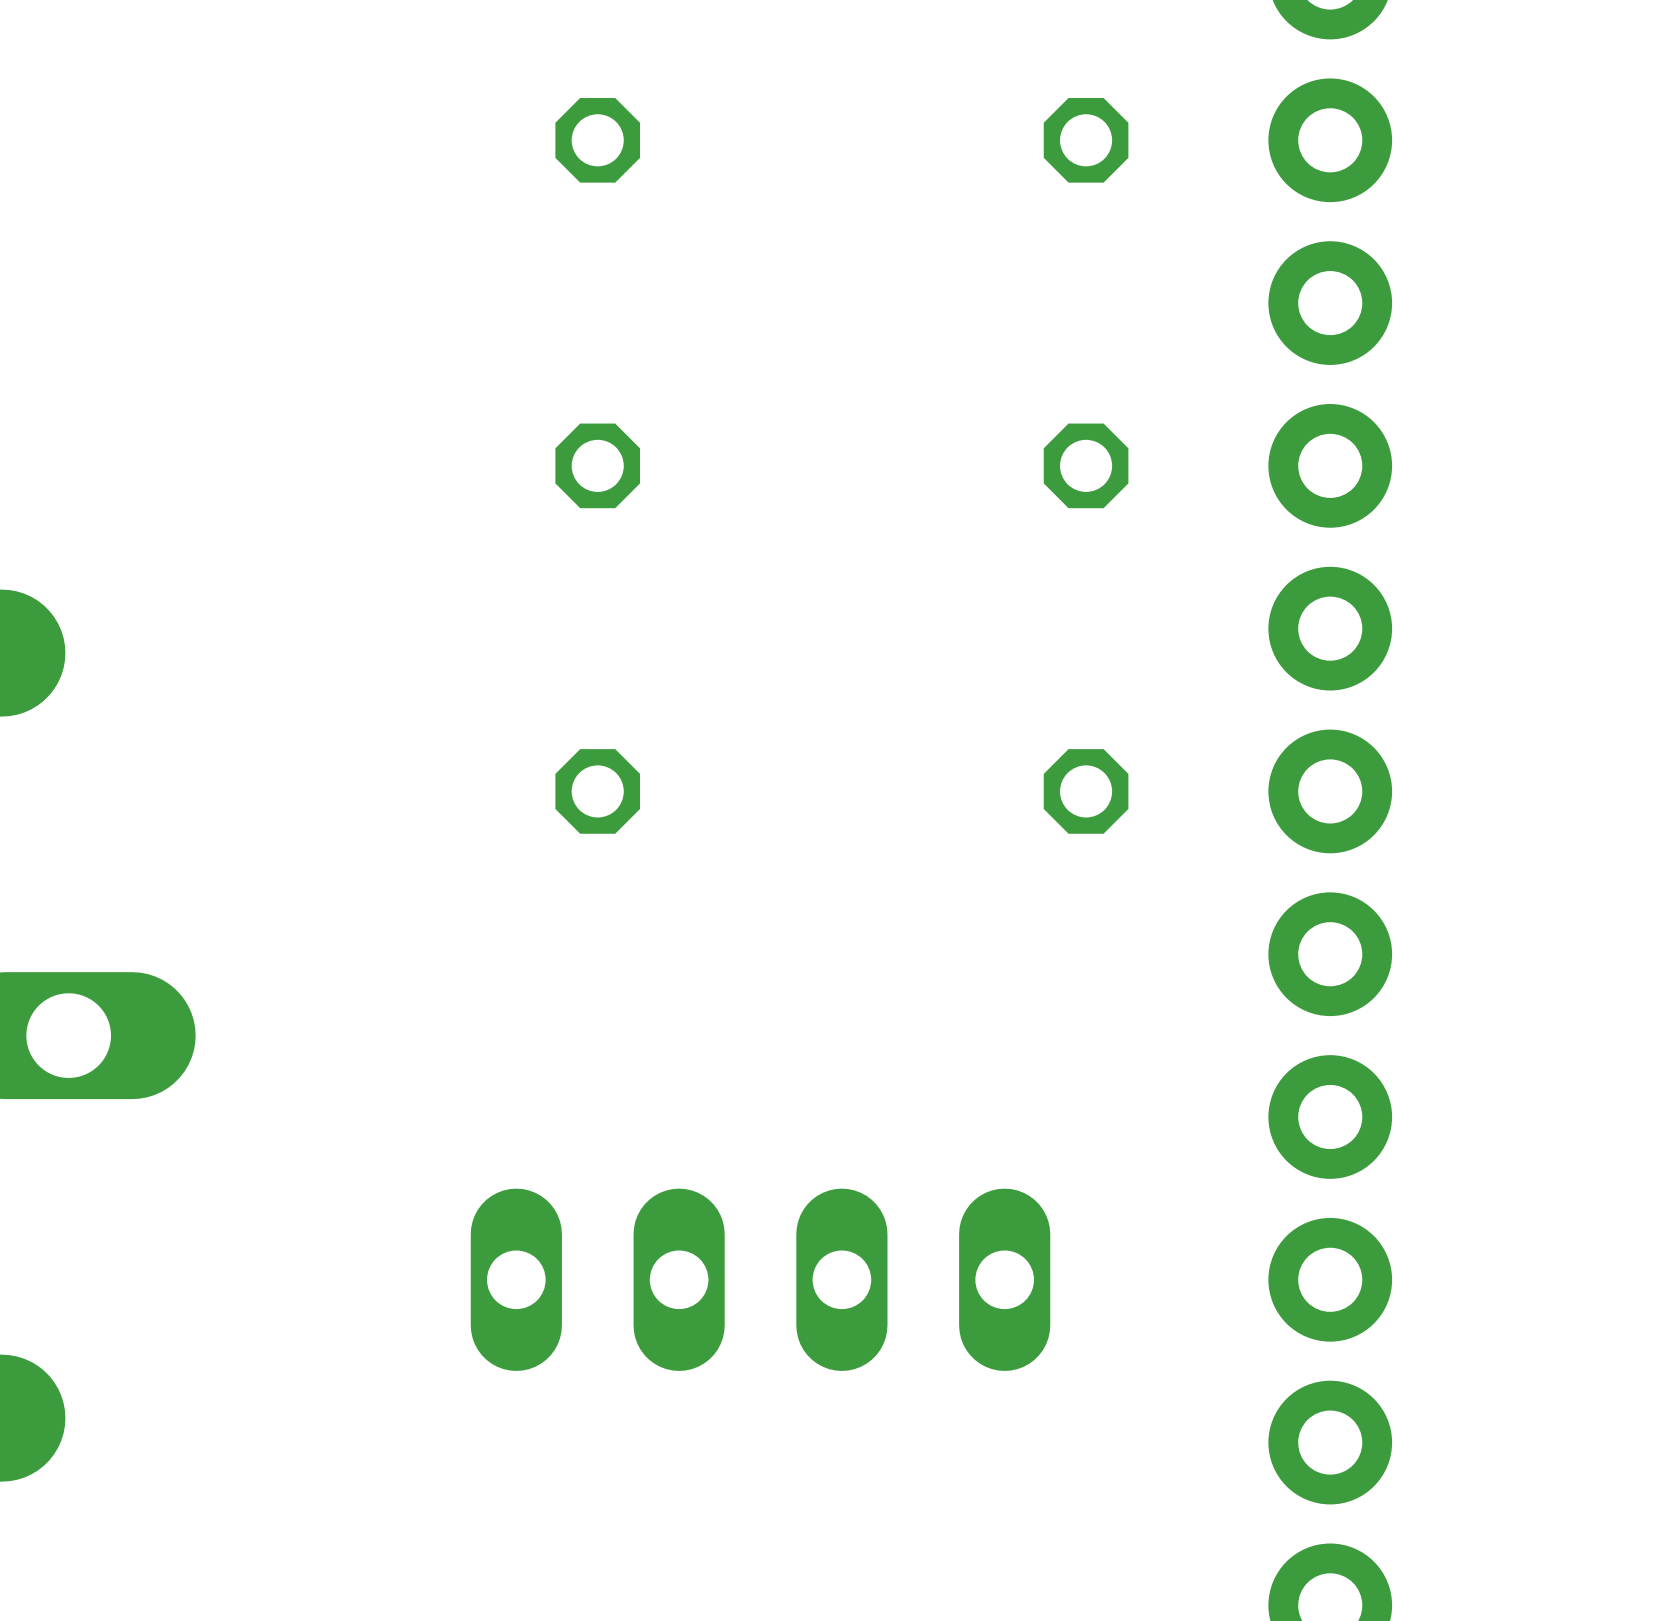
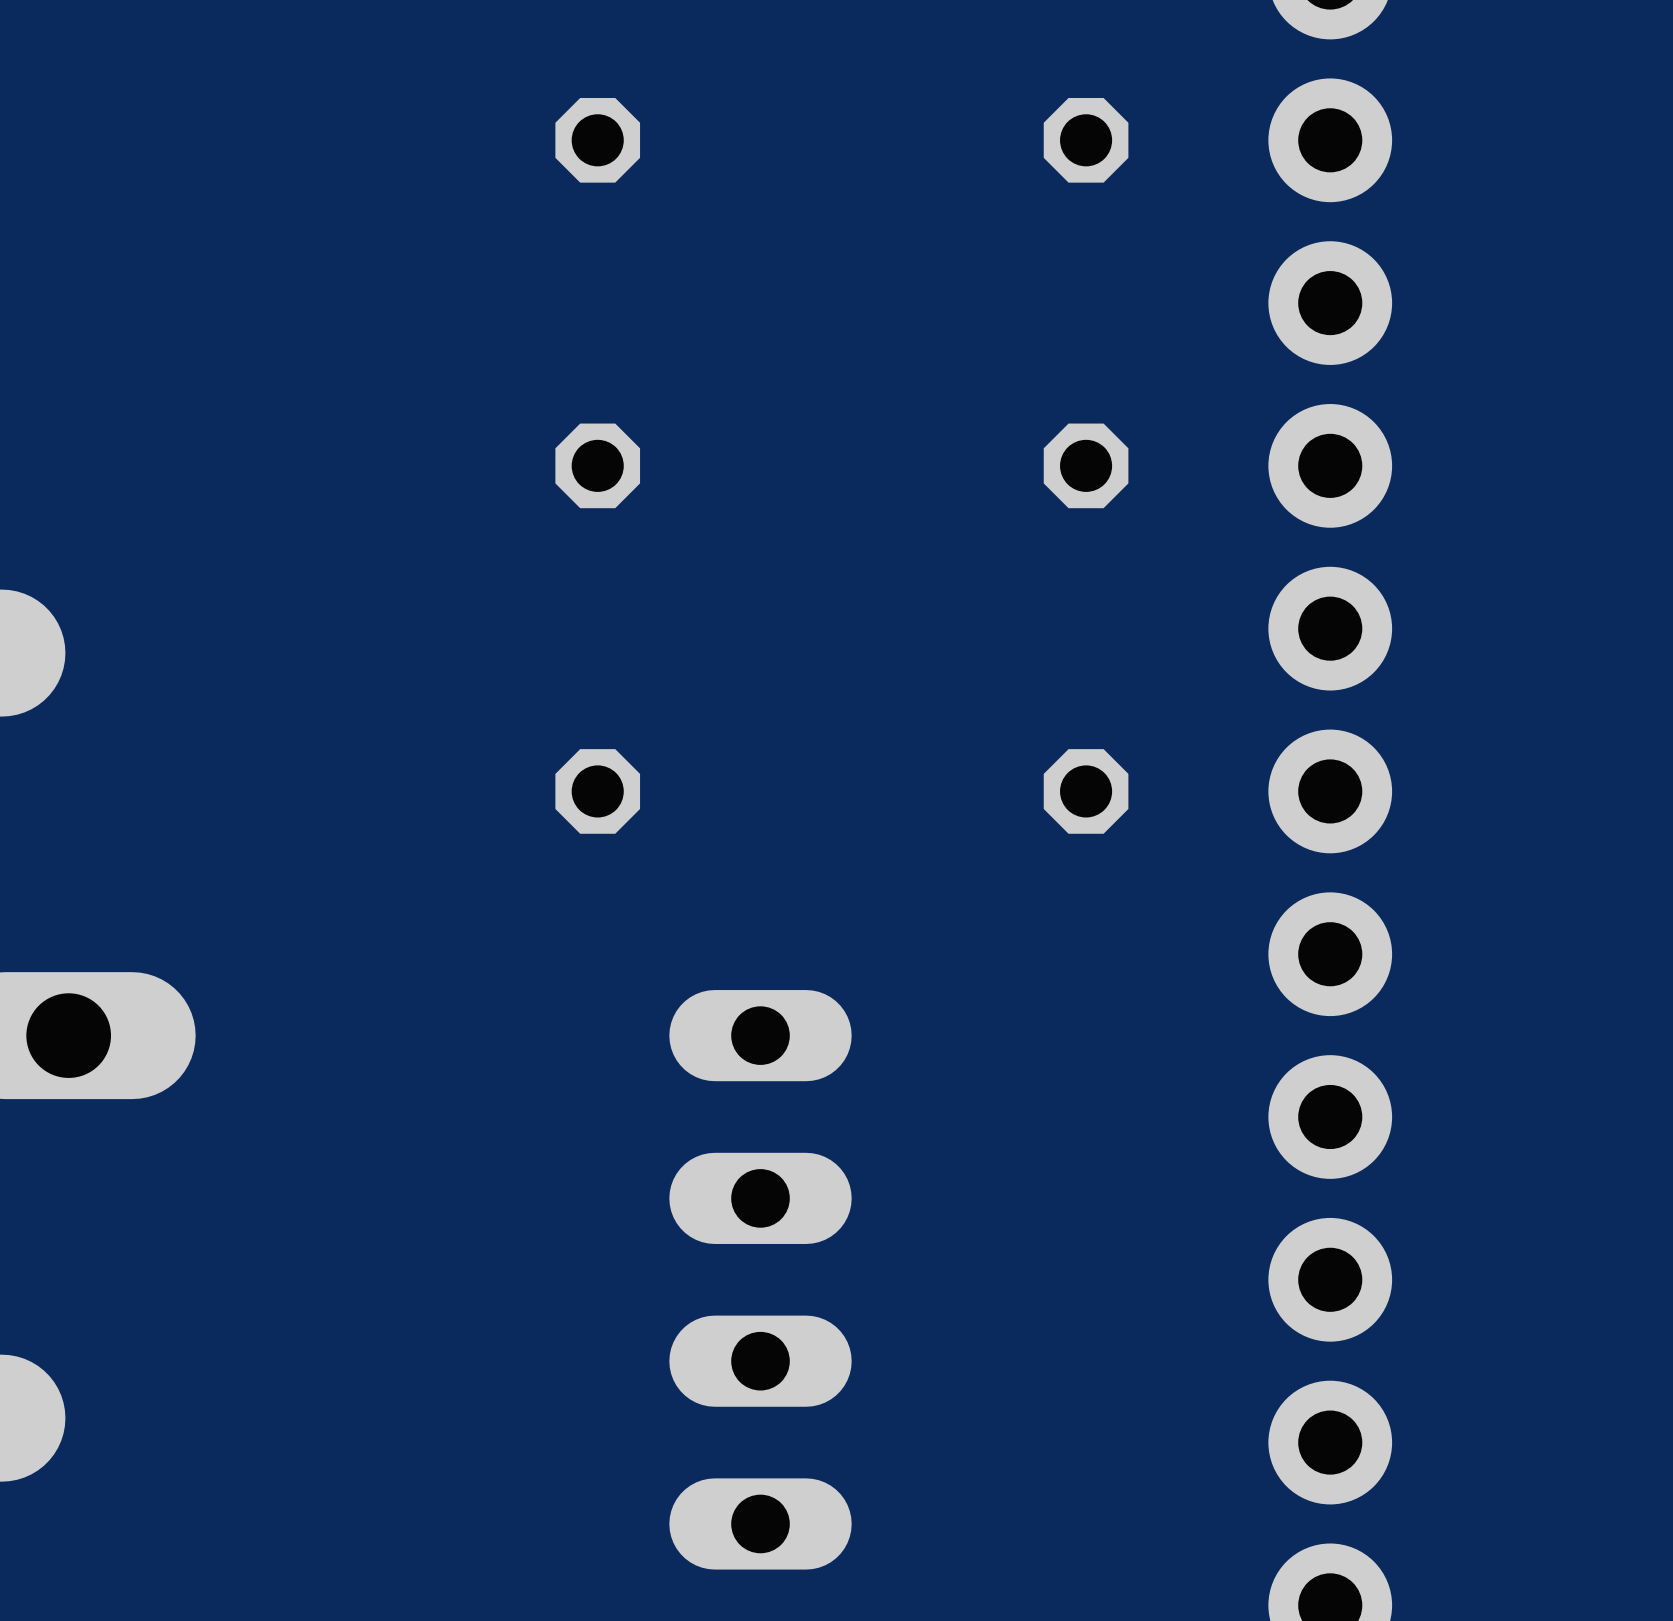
part rotation: 0° (760, 1279) -> 90° clockwise (760, 1279)

